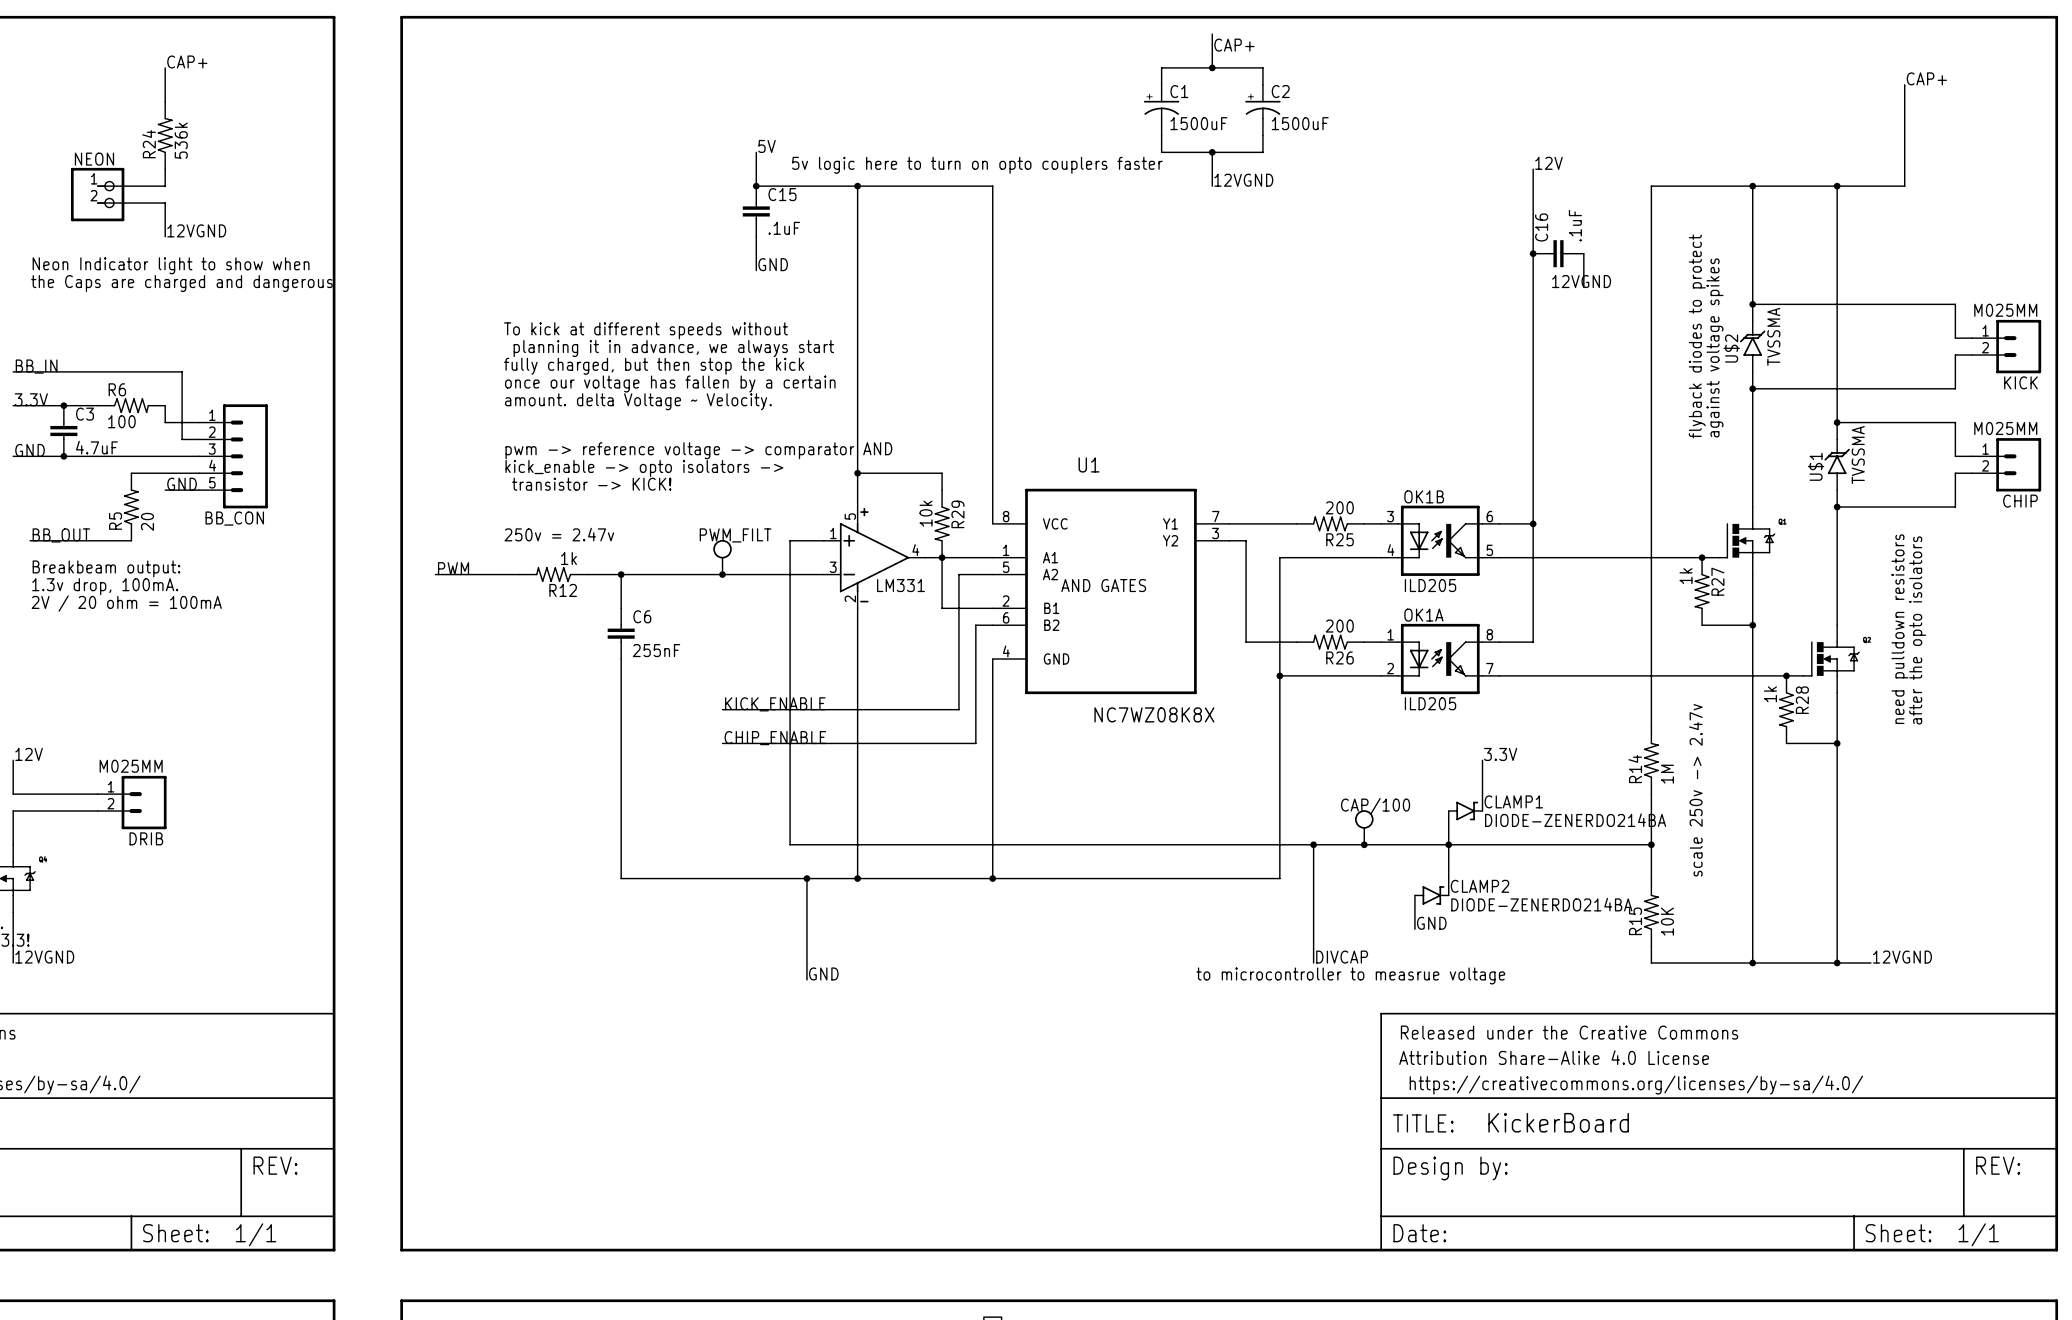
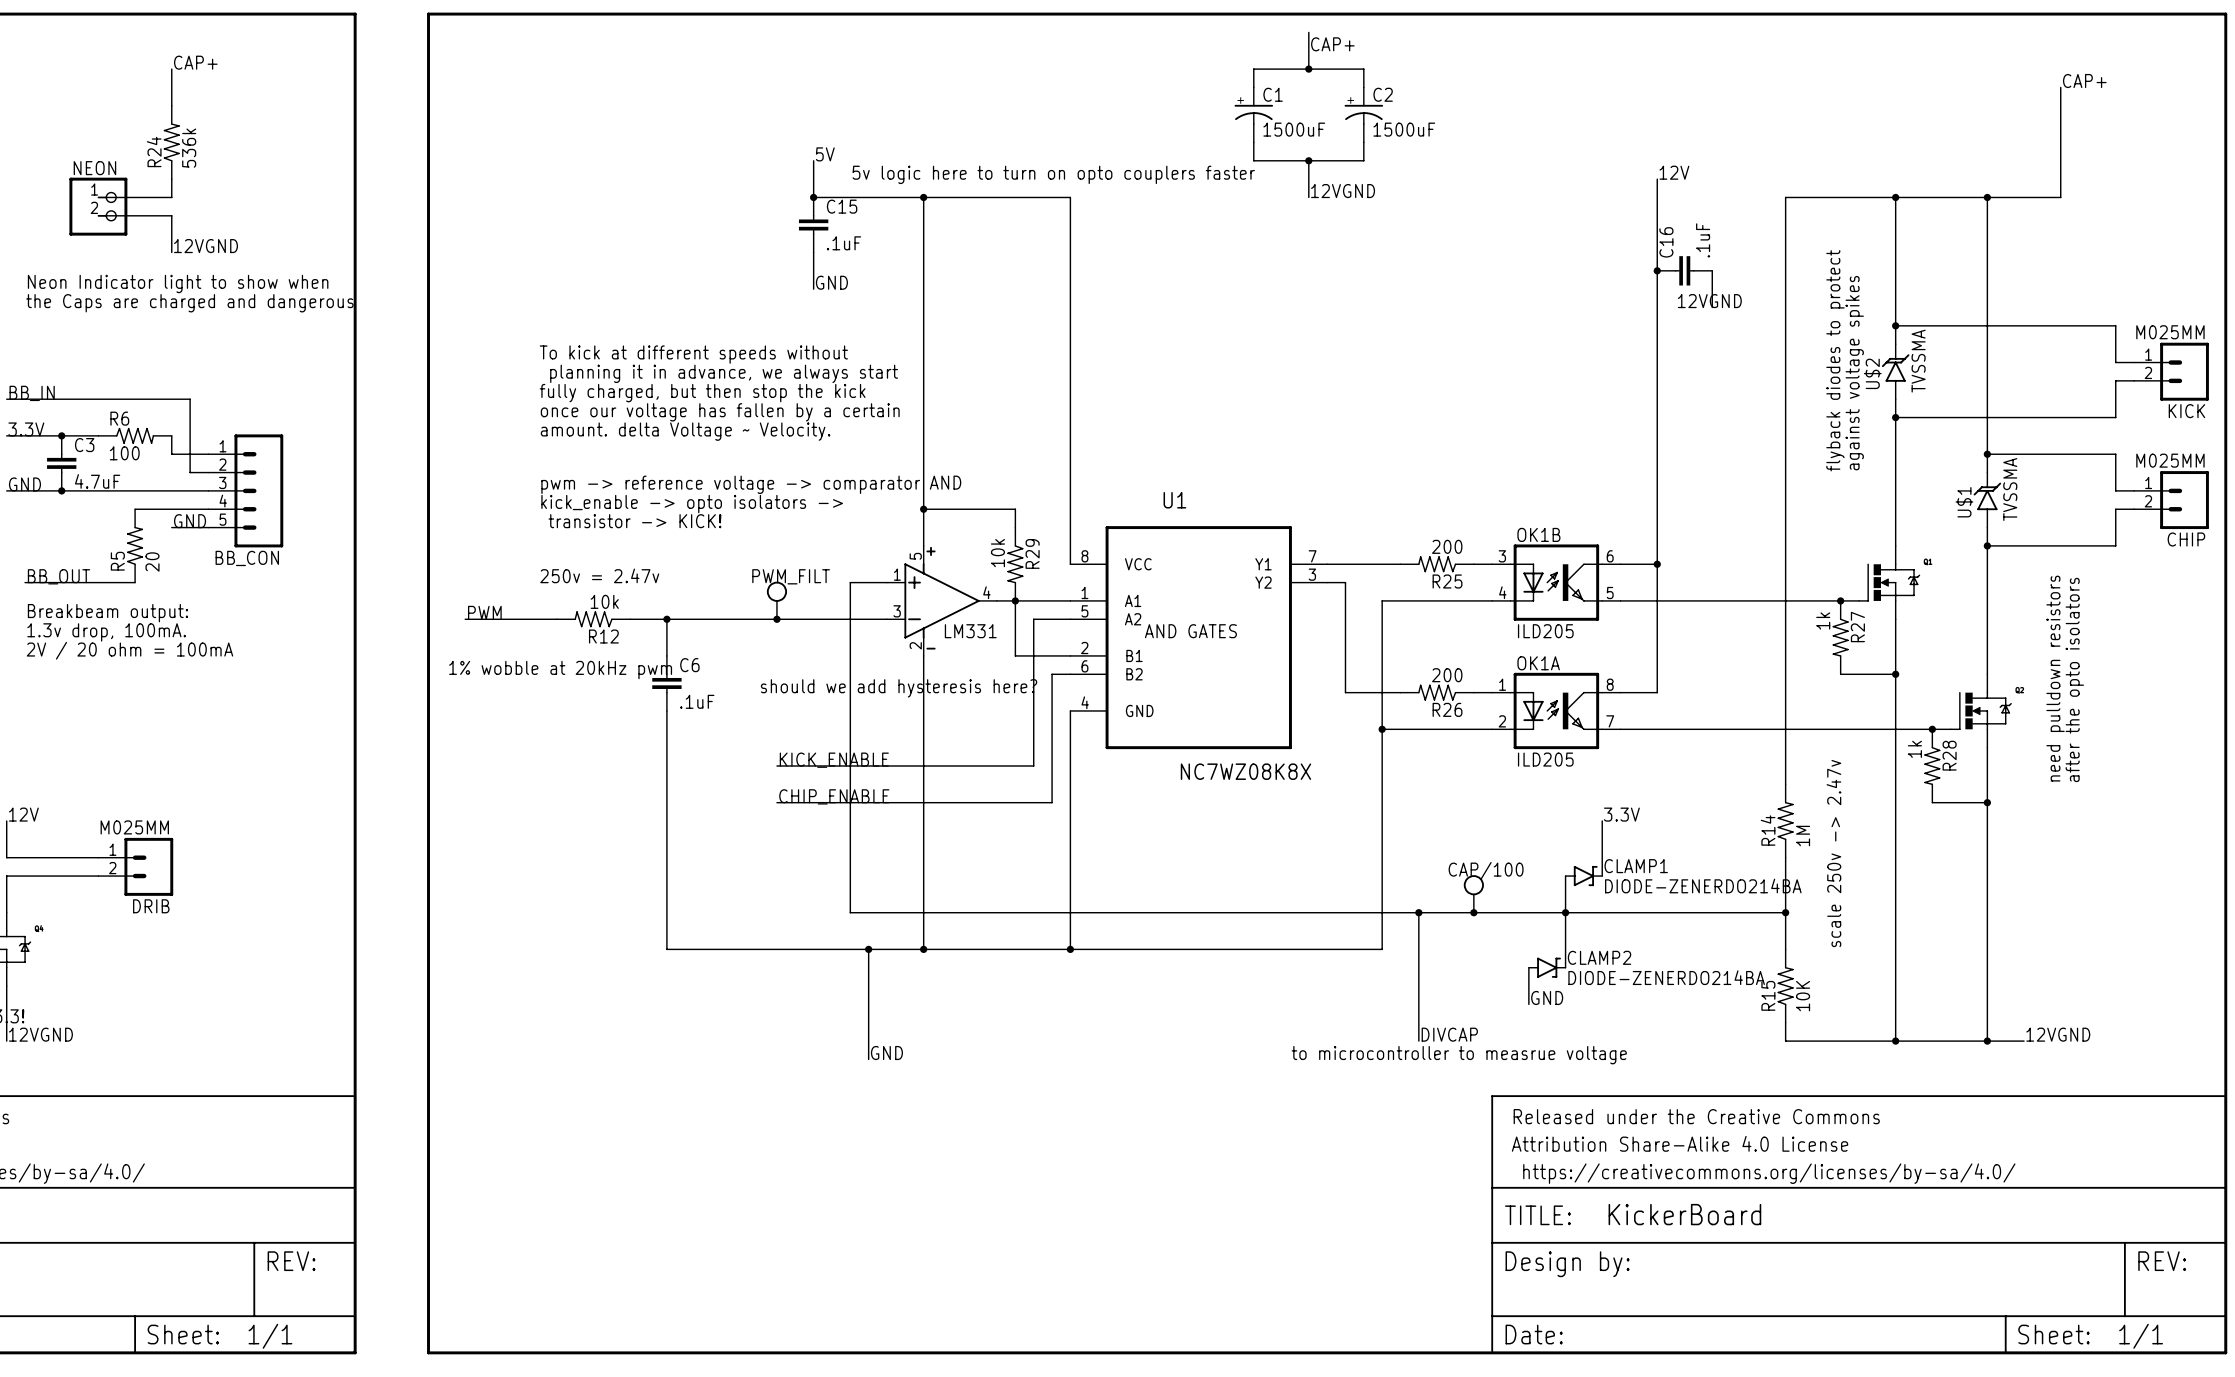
R12 value: 1k (568, 558) -> 10k (604, 601)
text: none -> 1% wobble at 20kHz pwm (560, 670)
text: none -> should we add hysteresis here? (899, 688)
C6 value: 255nF (656, 650) -> .1uF (697, 701)

